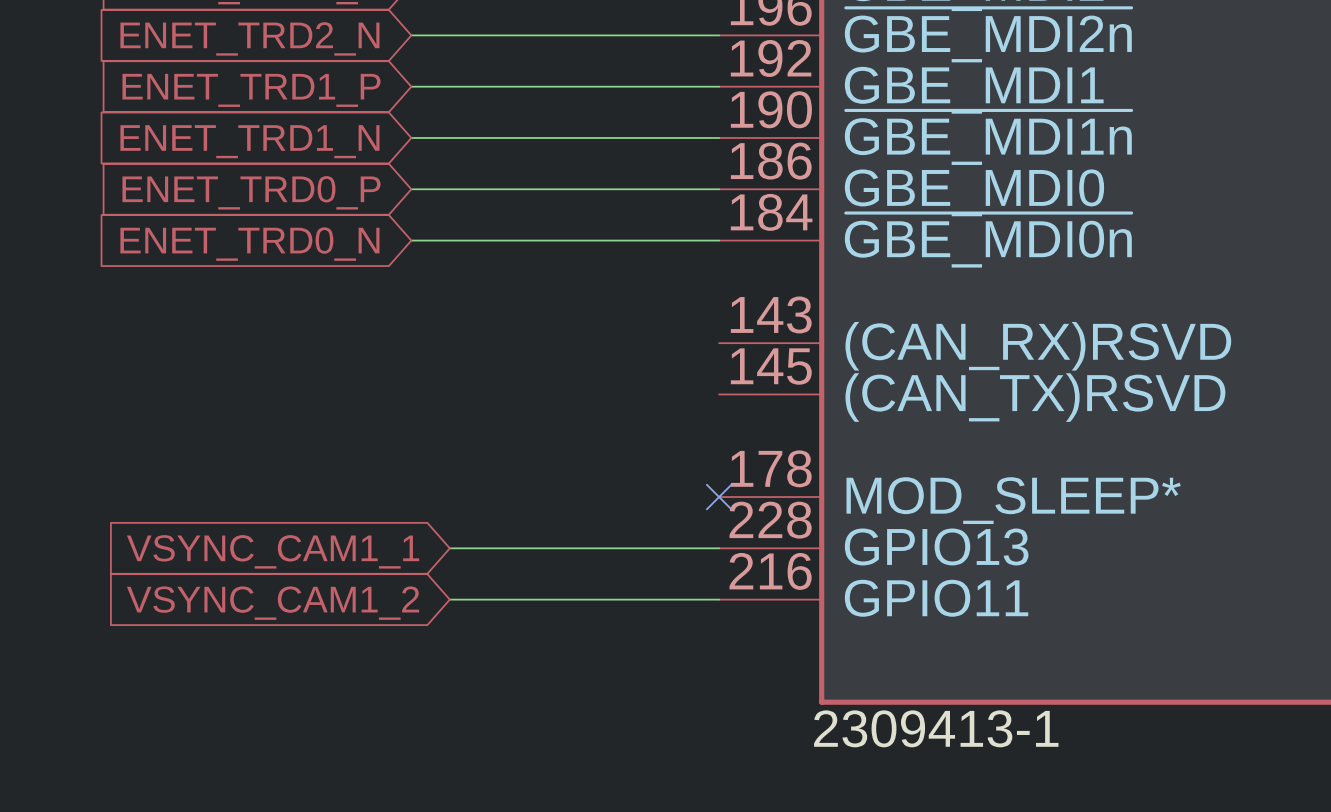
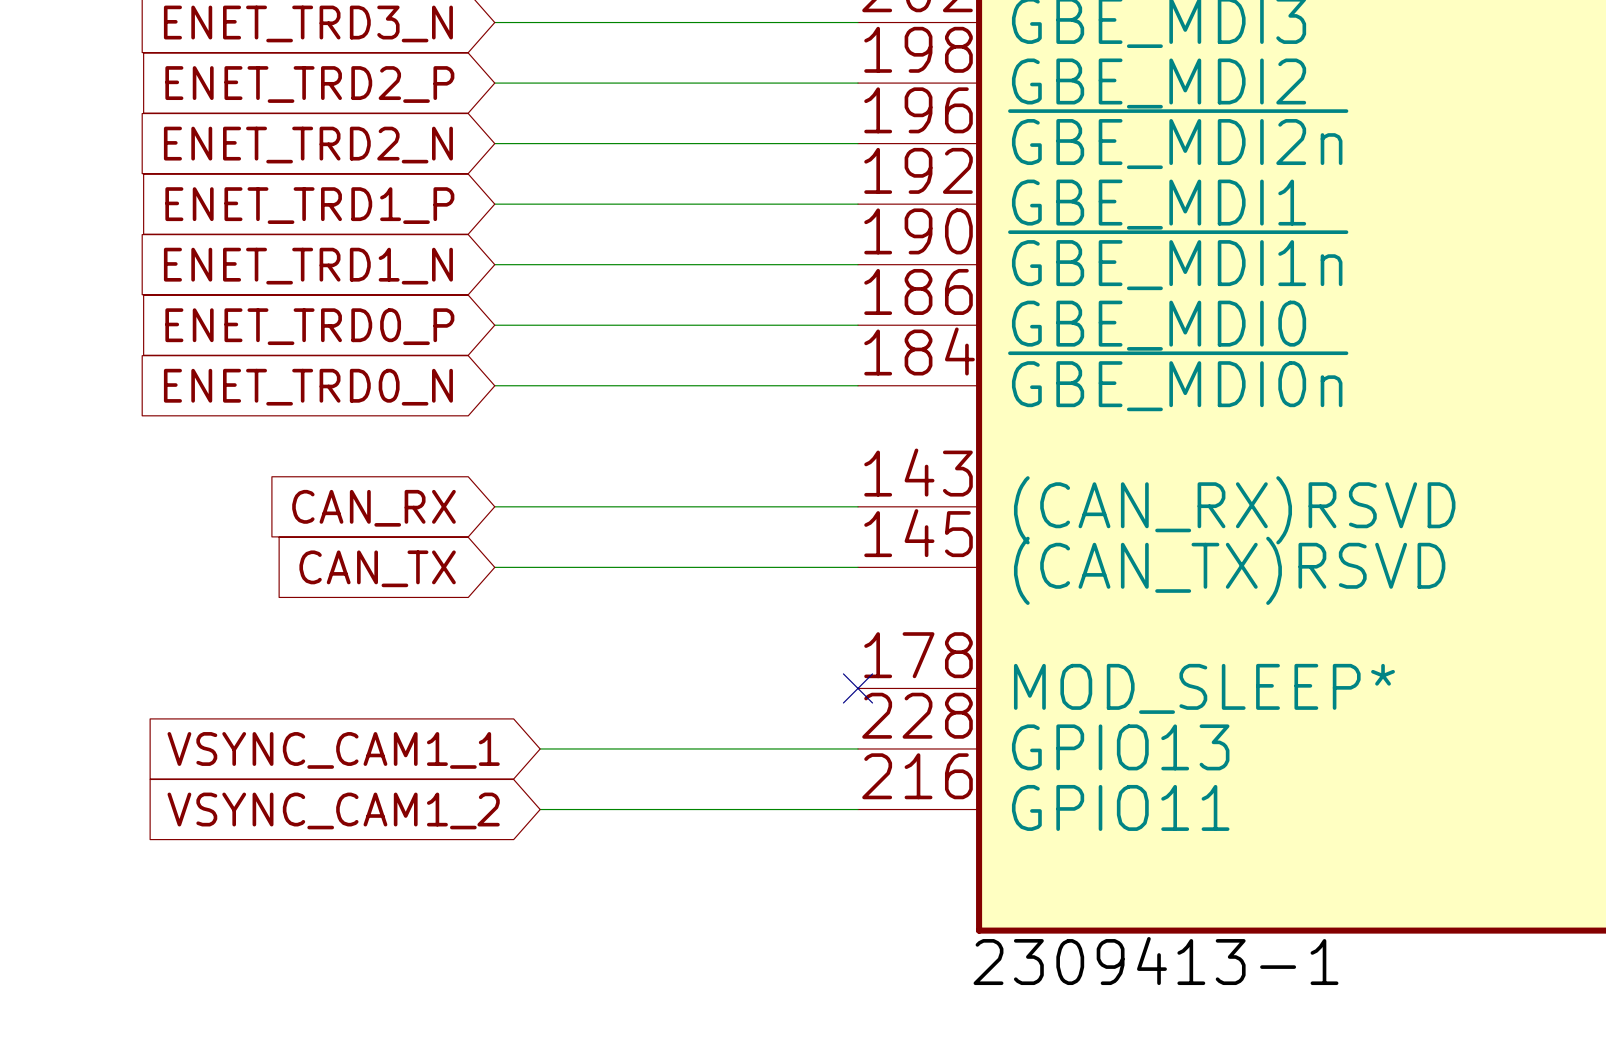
wire: none -> (494, 506) (857, 506)
global label: none -> CAN_RX (374, 508)
wire: none -> (494, 567) (857, 567)
global label: none -> CAN_TX (377, 568)

